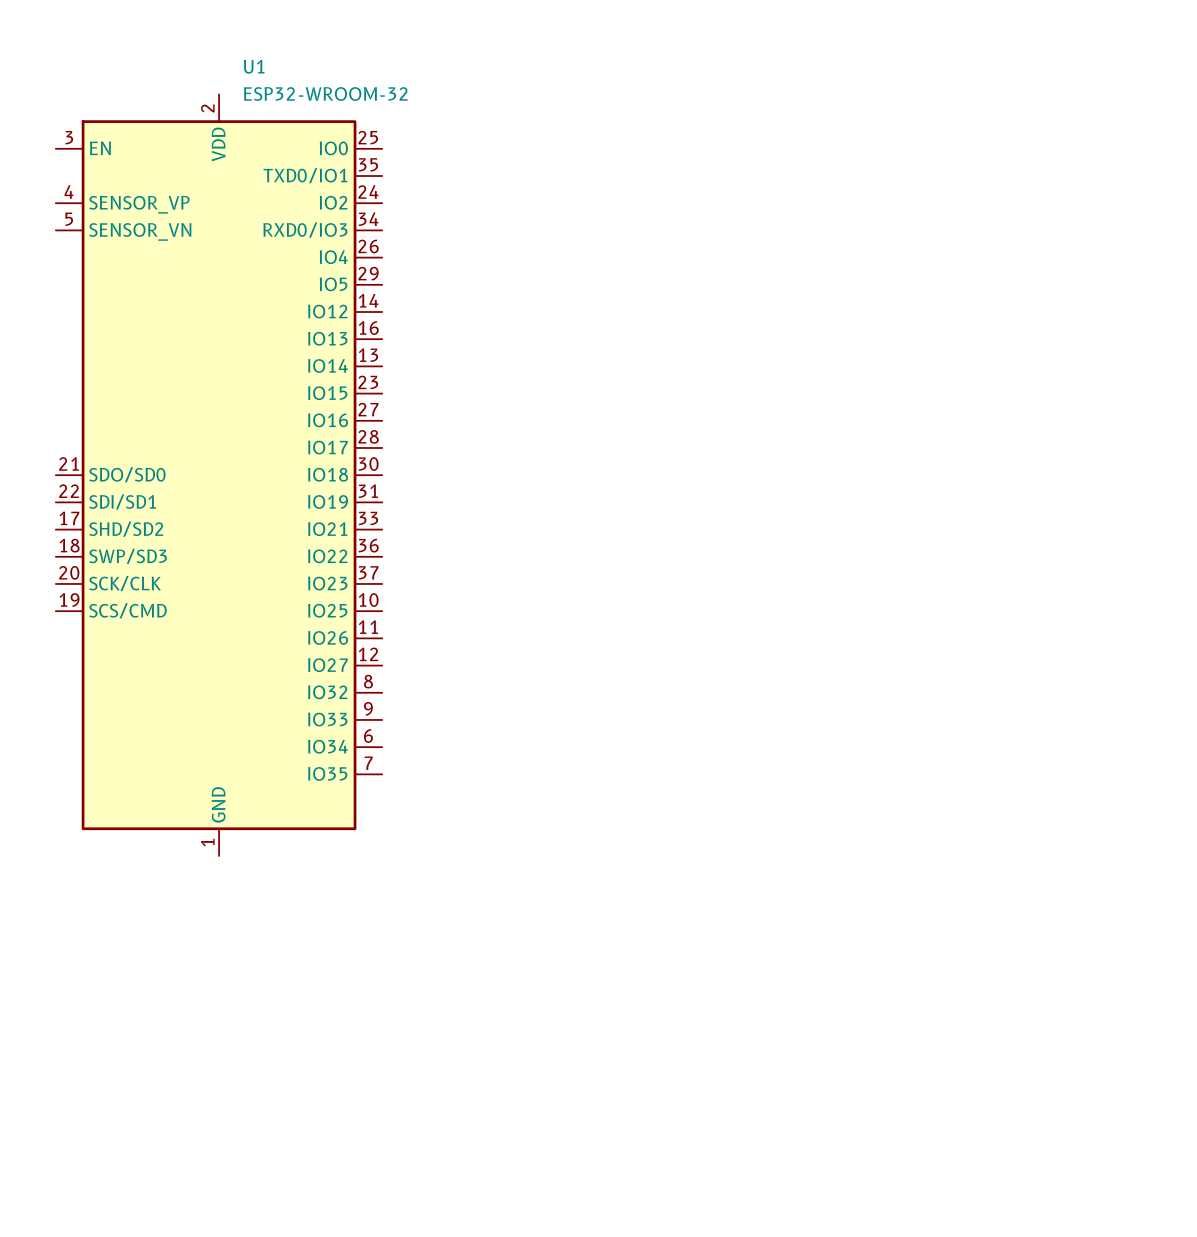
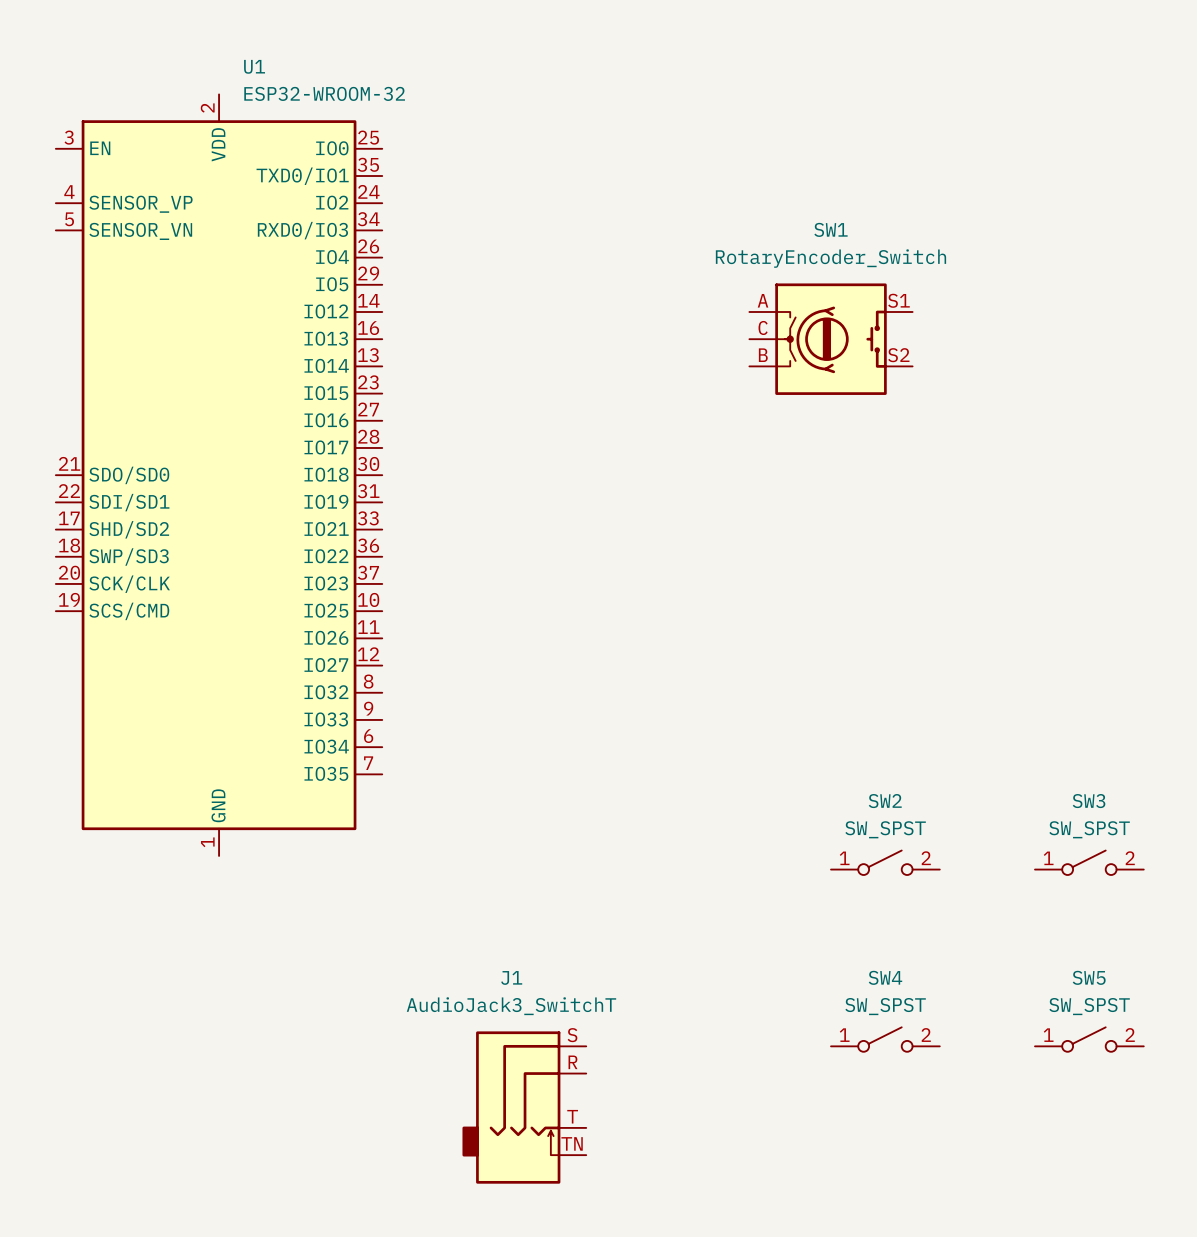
SW1: none -> RotaryEncoder_Switch (831, 339)
SW2: none -> SW_SPST (885, 862)
SW3: none -> SW_SPST (1089, 862)
SW4: none -> SW_SPST (885, 1039)
SW5: none -> SW_SPST (1089, 1039)
J1: none -> AudioJack3_SwitchT (524, 1107)

